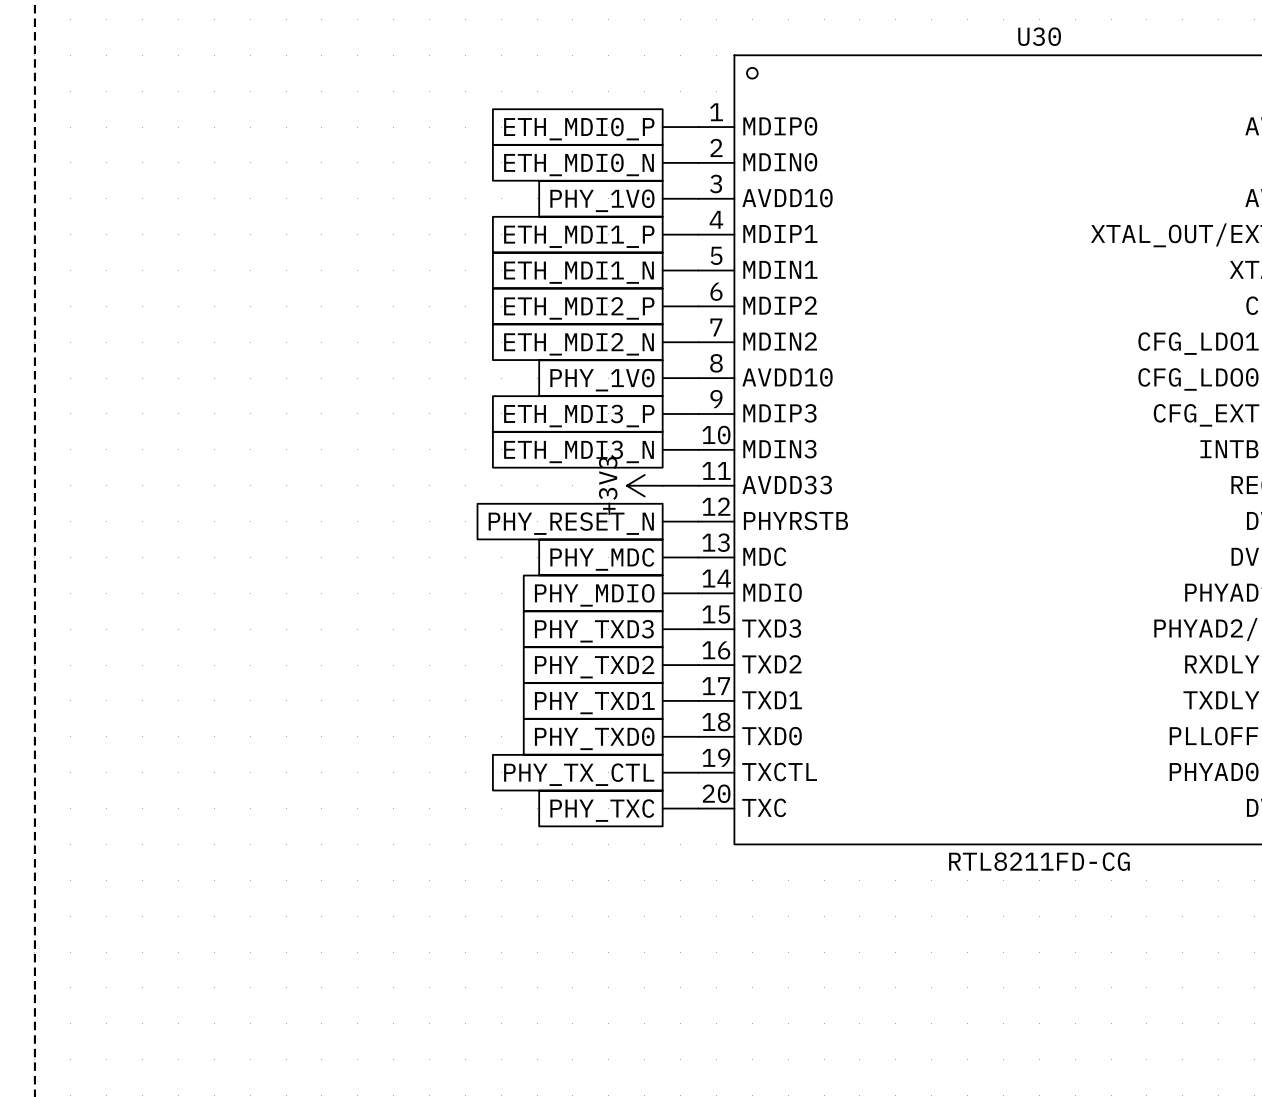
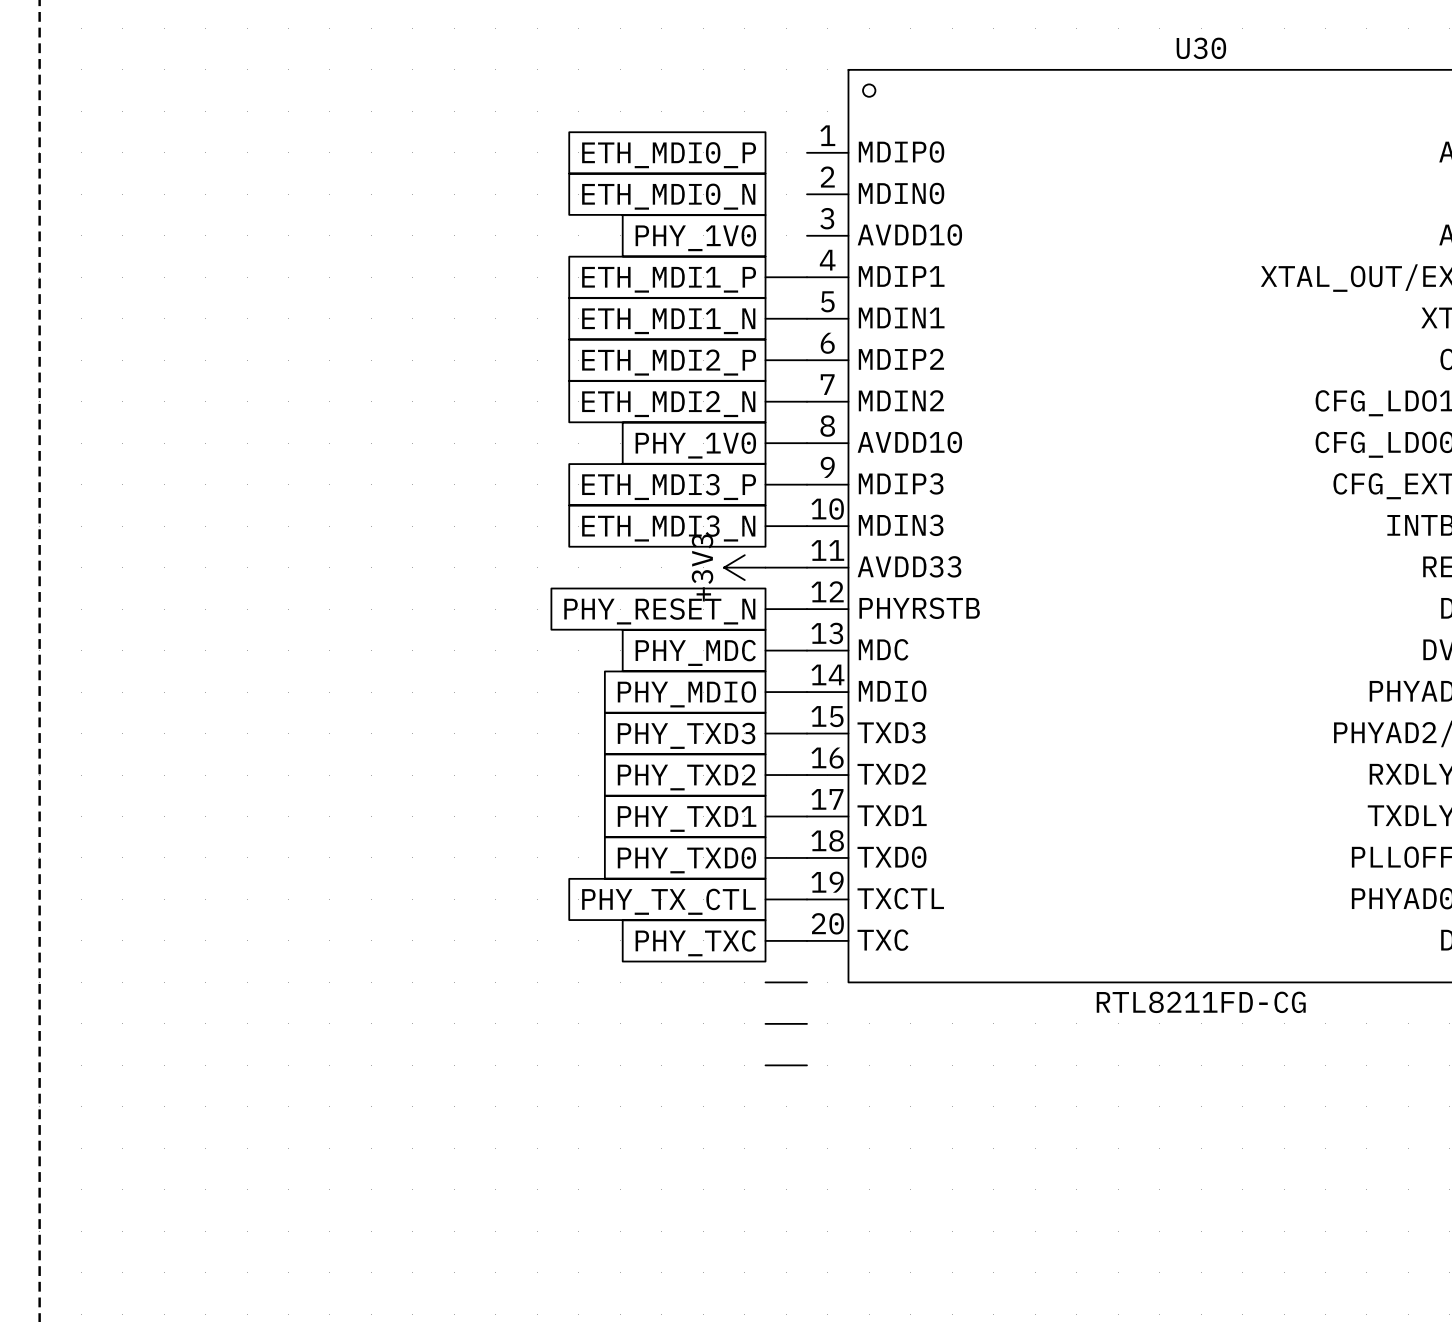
wire: (662, 127) (698, 127) -> none
wire: (662, 162) (698, 162) -> none
wire: (662, 198) (698, 198) -> none
wire: none -> (765, 982) (807, 982)
wire: none -> (765, 1023) (807, 1023)
wire: none -> (765, 1065) (807, 1065)

